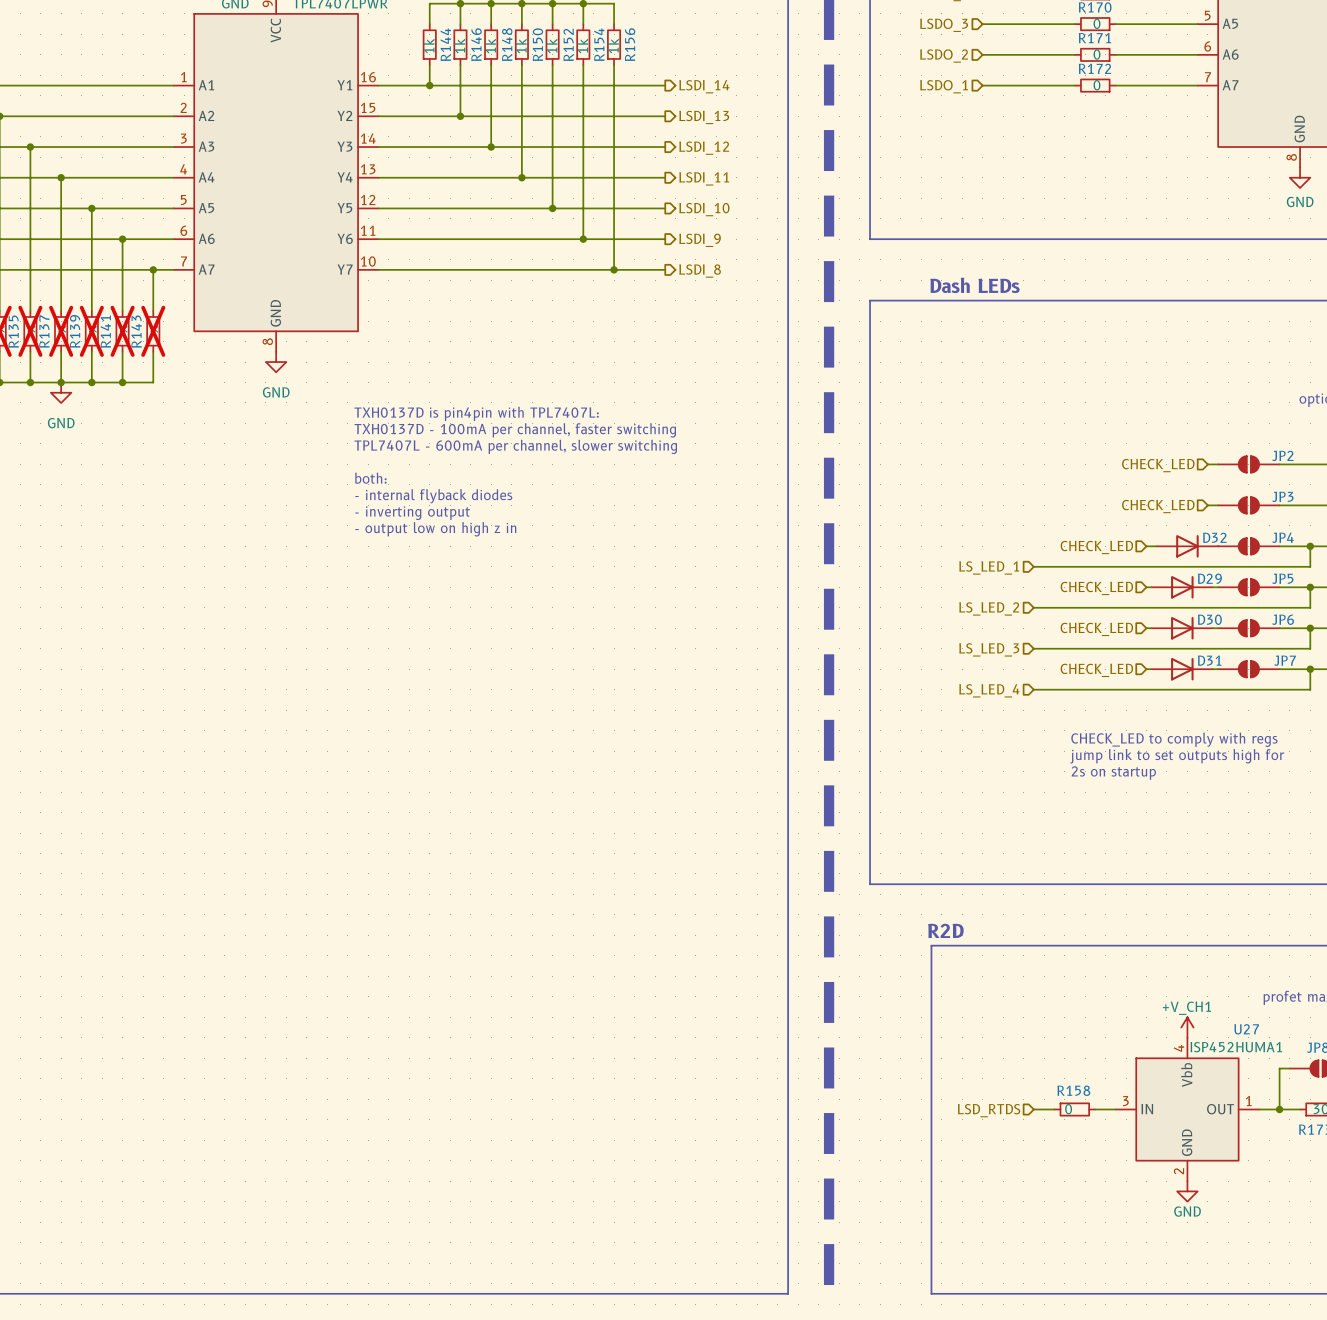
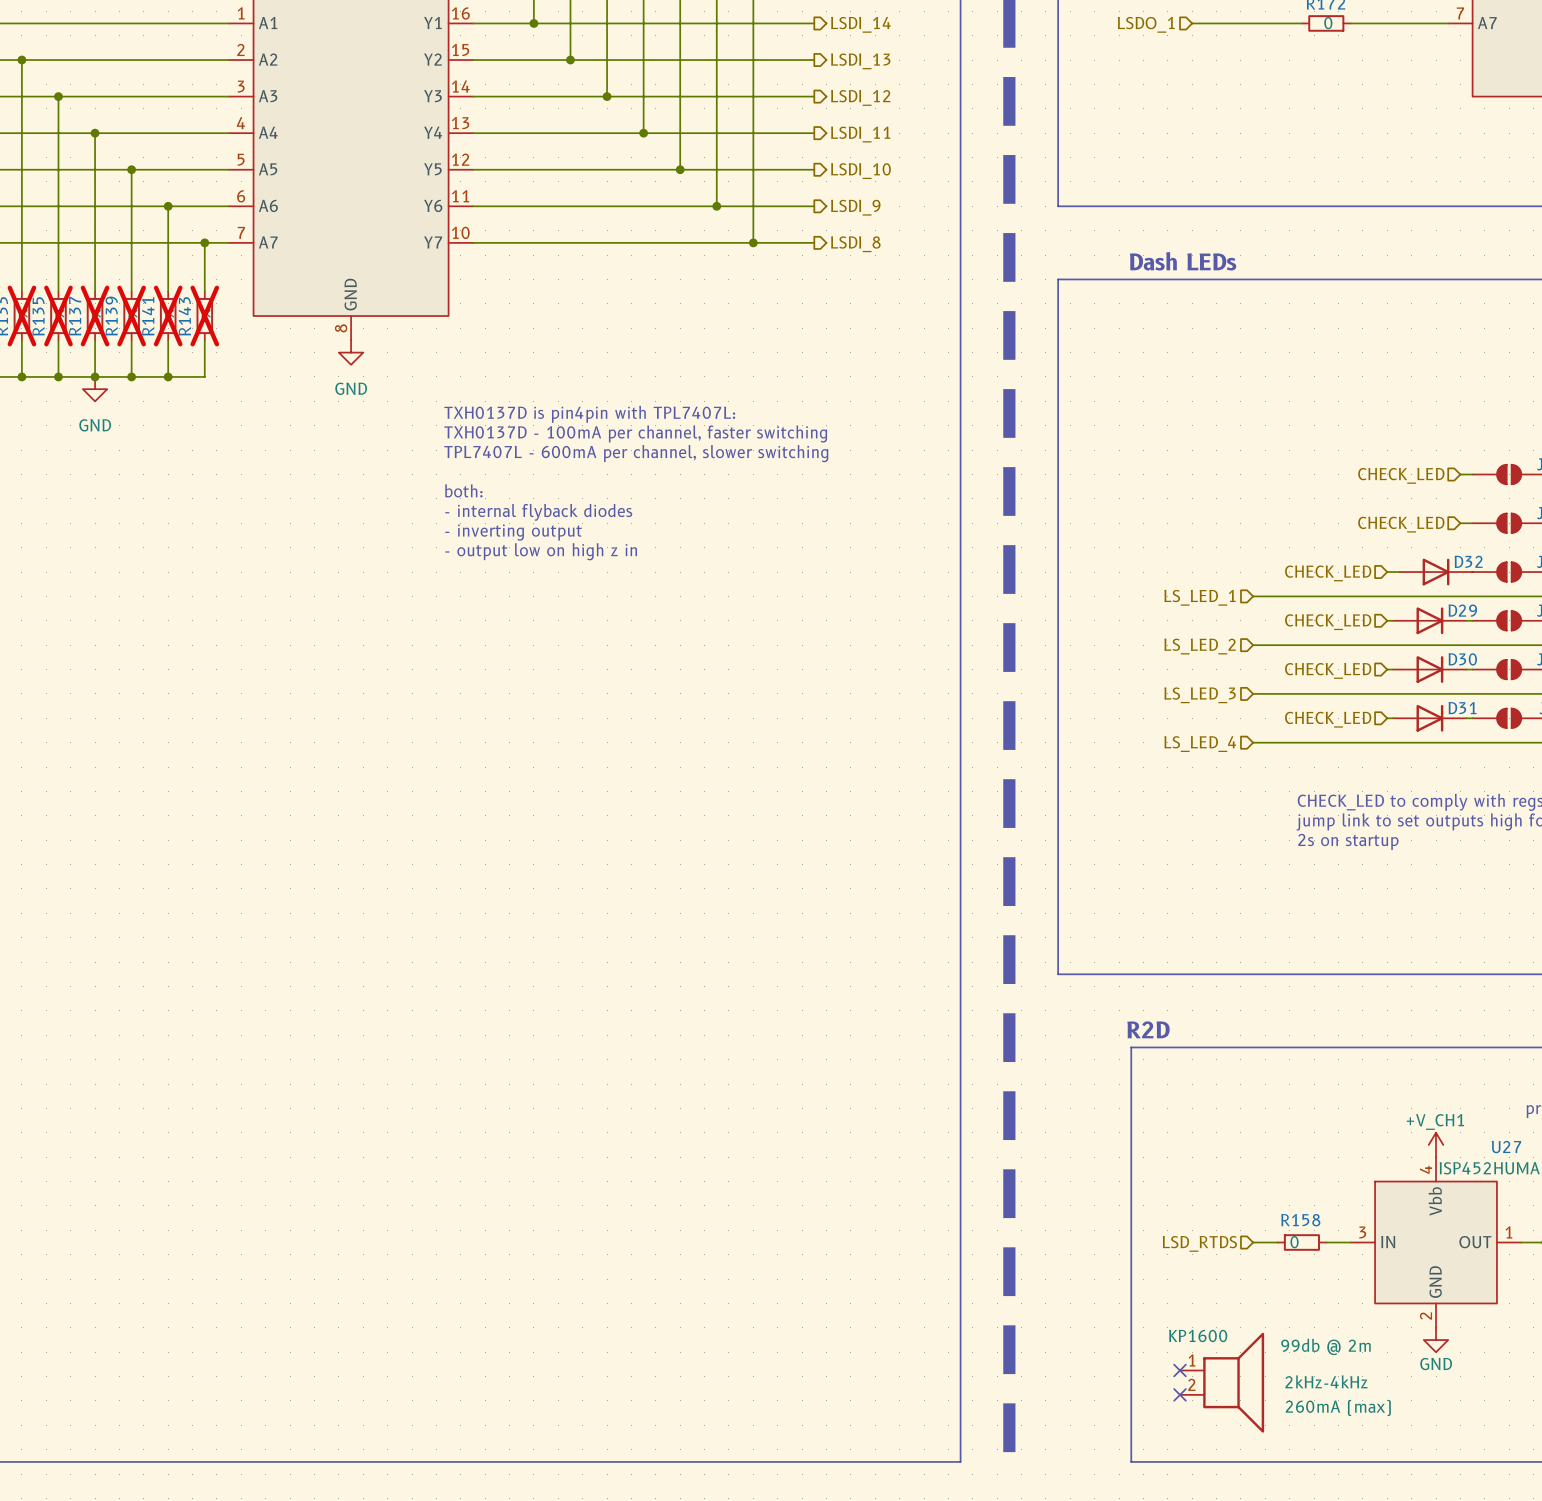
no-connect mark: none -> (1180, 1370)
power symbol: none -> KP1600 (1222, 1382)
no-connect mark: none -> (1180, 1394)

